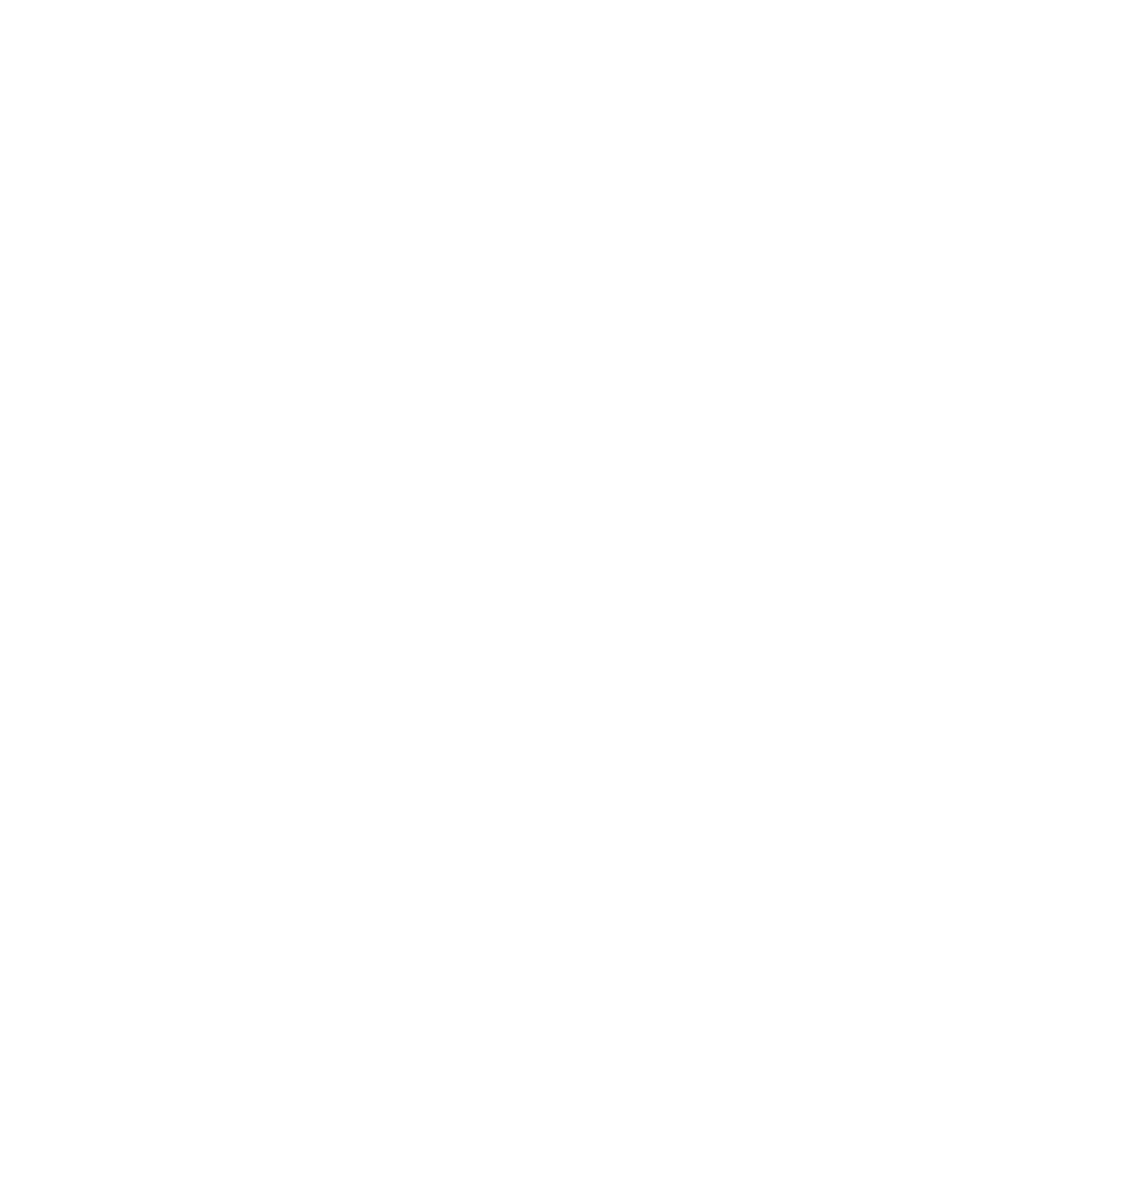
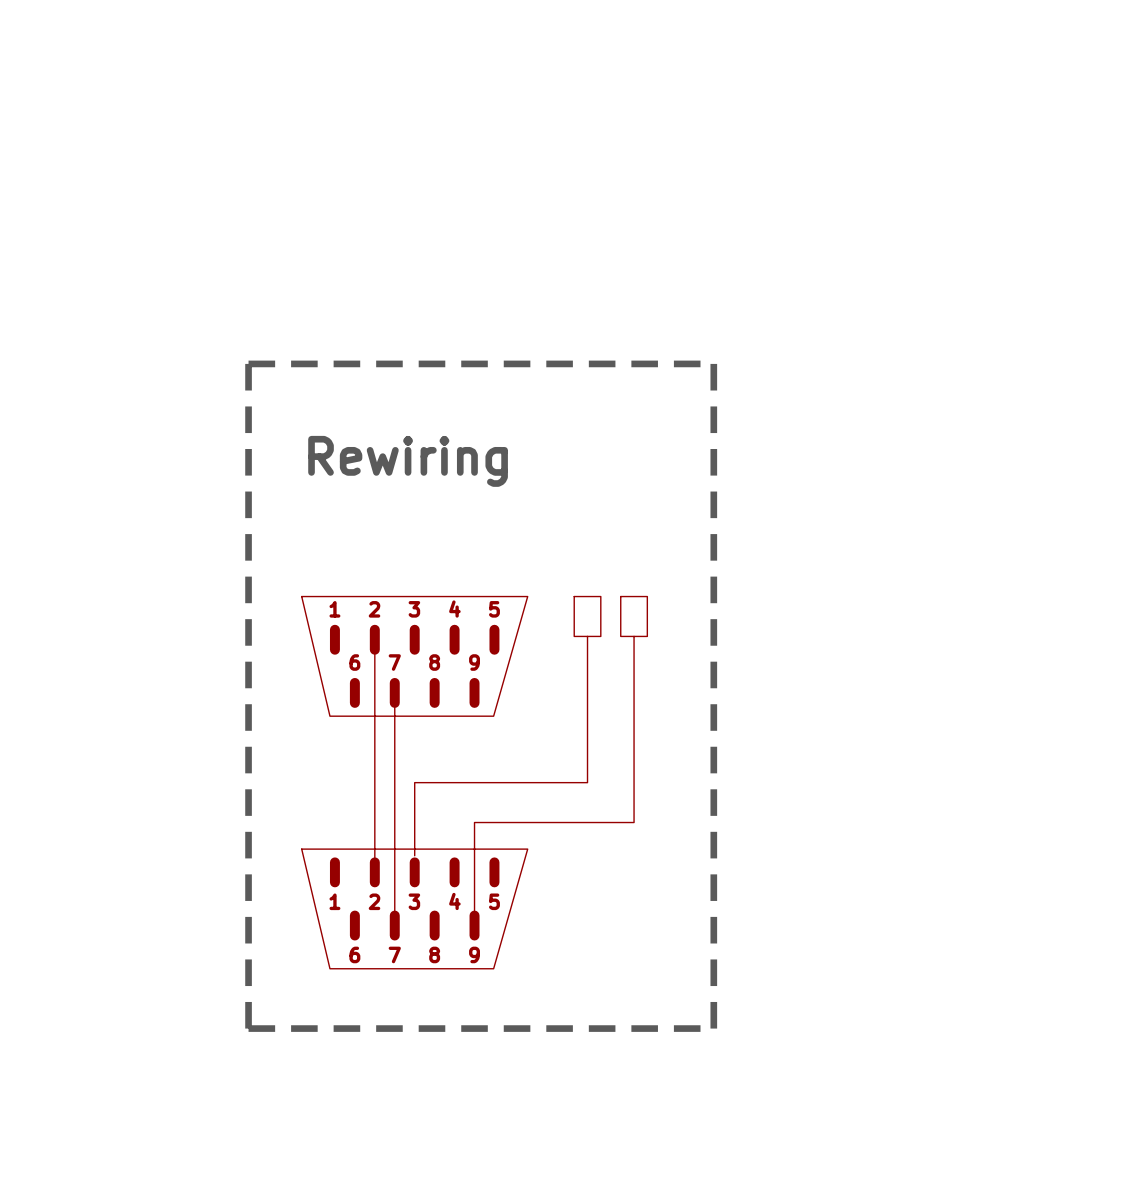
line: none -> (248, 363) (713, 363) (713, 1028) (248, 1028) (248, 363)
text: none -> Rewiring (408, 461)
part: none -> (474, 782)

